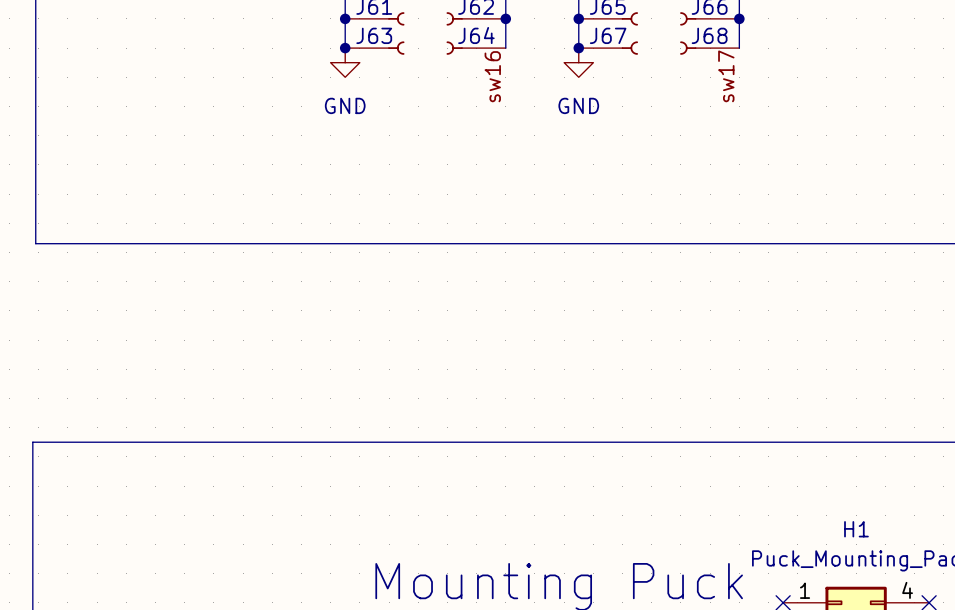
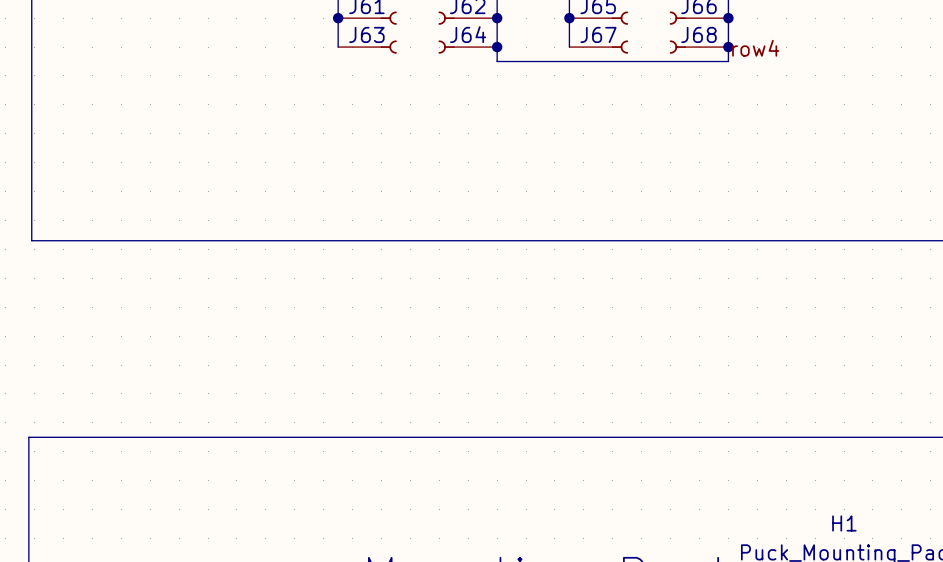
junction: (345, 48) -> none
wire: none -> (497, 47) (497, 61) (728, 61) (728, 47)
junction: none -> (497, 47)
junction: (578, 48) -> none
junction: none -> (728, 47)
power symbol: GND (345, 62) -> none
power symbol: GND (578, 62) -> none
label: sw16 (492, 76) -> none
label: sw17 (726, 76) -> row4 (755, 48)

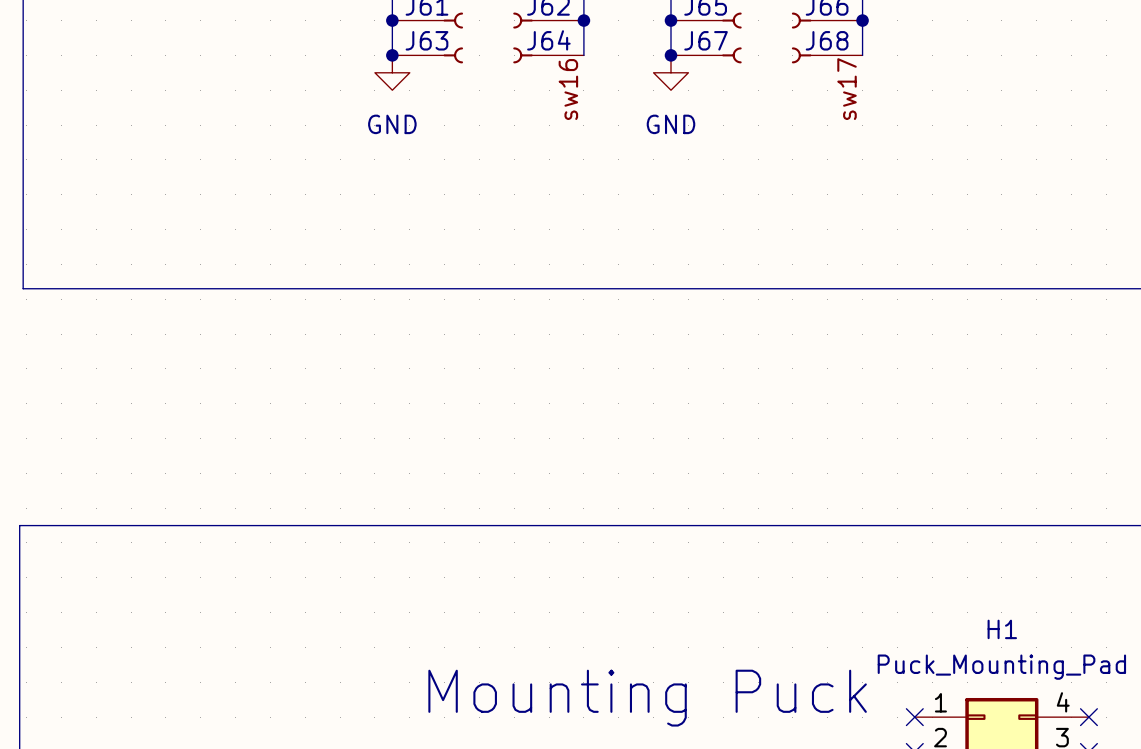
junction: none -> (392, 55)
wire: (497, 47) (497, 61) (728, 61) (728, 47) -> none
junction: (497, 47) -> none
junction: none -> (671, 55)
junction: (728, 47) -> none
label: row4 (755, 48) -> sw17 (847, 89)
power symbol: none -> GND (392, 72)
power symbol: none -> GND (671, 72)
label: none -> sw16 (568, 89)

